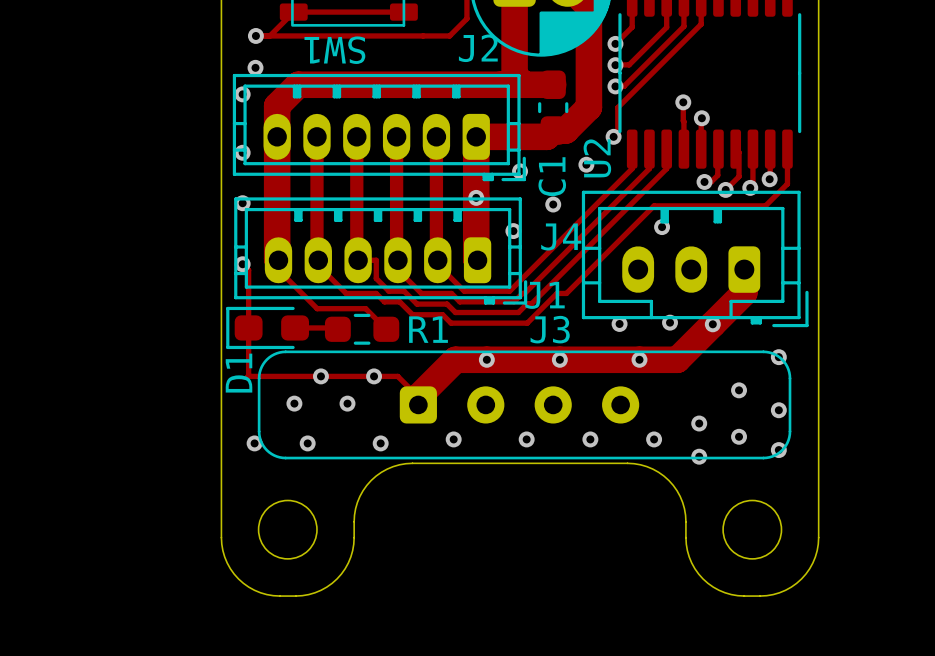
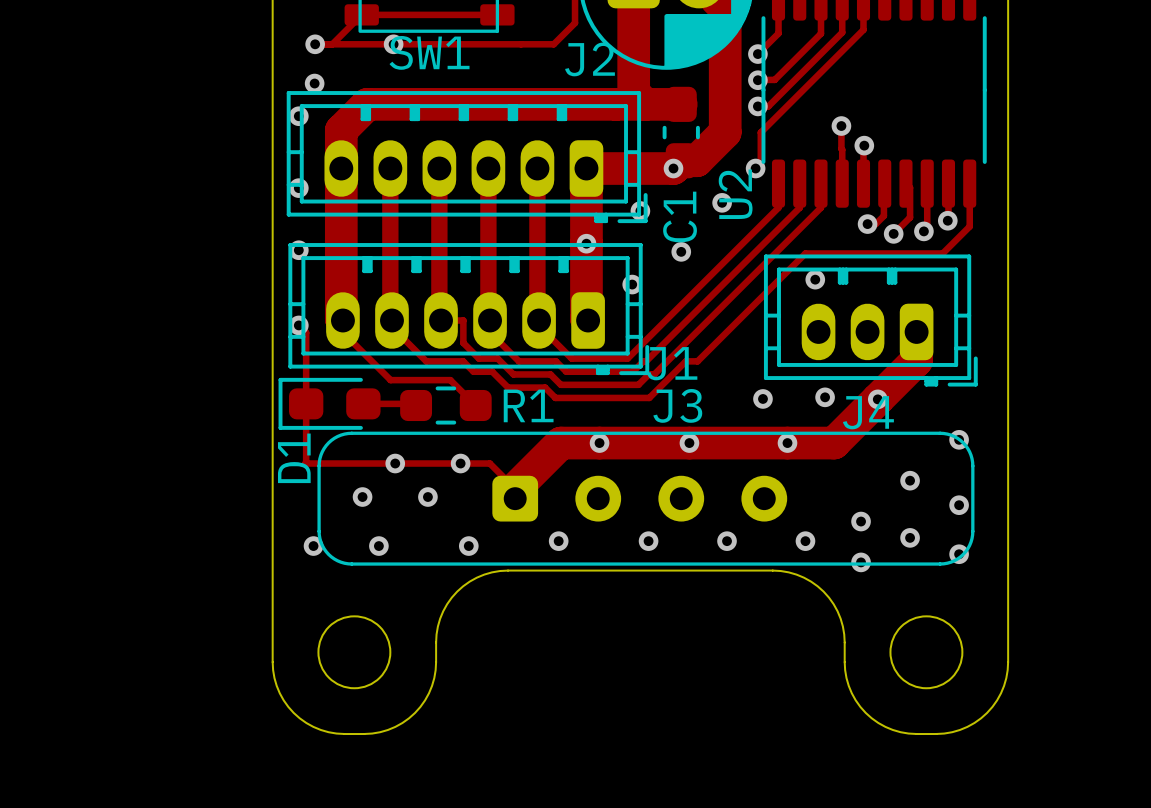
via: none -> (393, 44)
SW1 name rotation: 0° (334, 50) -> 180° (429, 52)
via: none -> (673, 168)
J4 footprint: [581, 190, 809, 328] -> [763, 254, 978, 387]
J4 name position: J4 (561, 236) -> J4 (868, 412)

